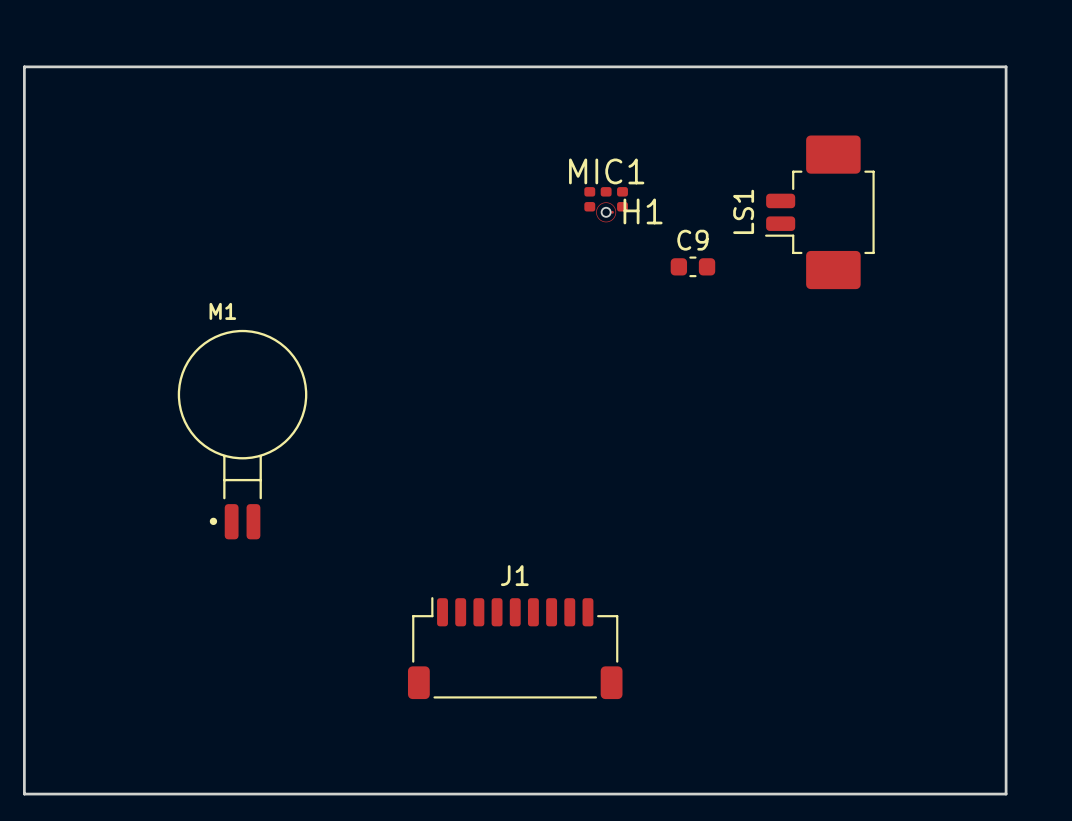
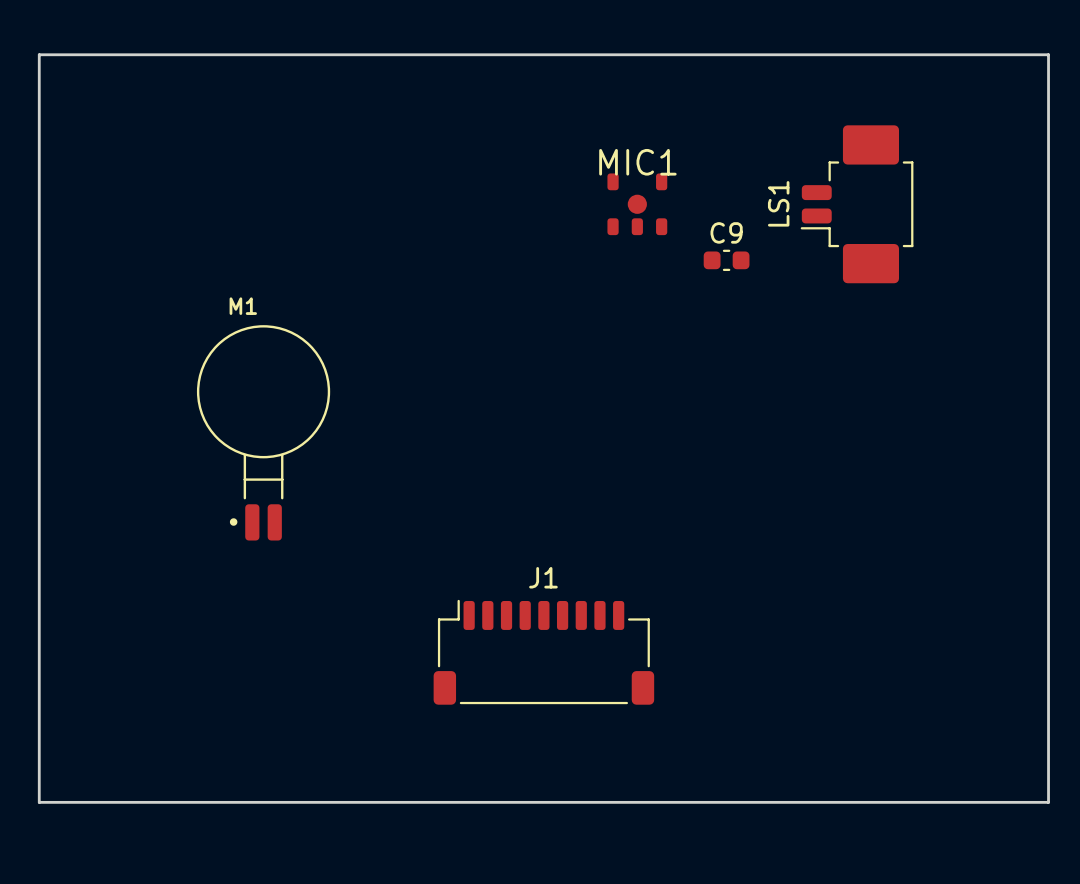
MIC1 footprint: [584, 187, 628, 223] -> [607, 173, 668, 236]
H1: (606, 212) -> none

